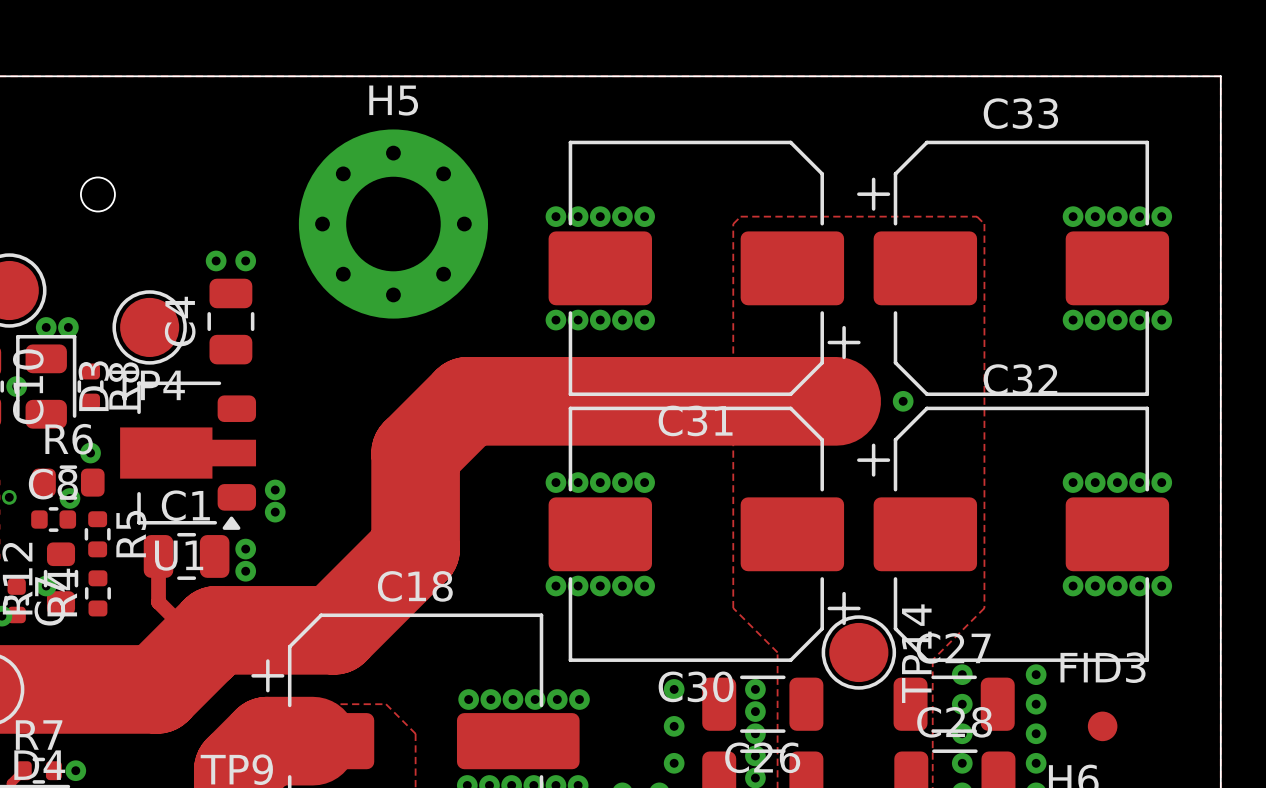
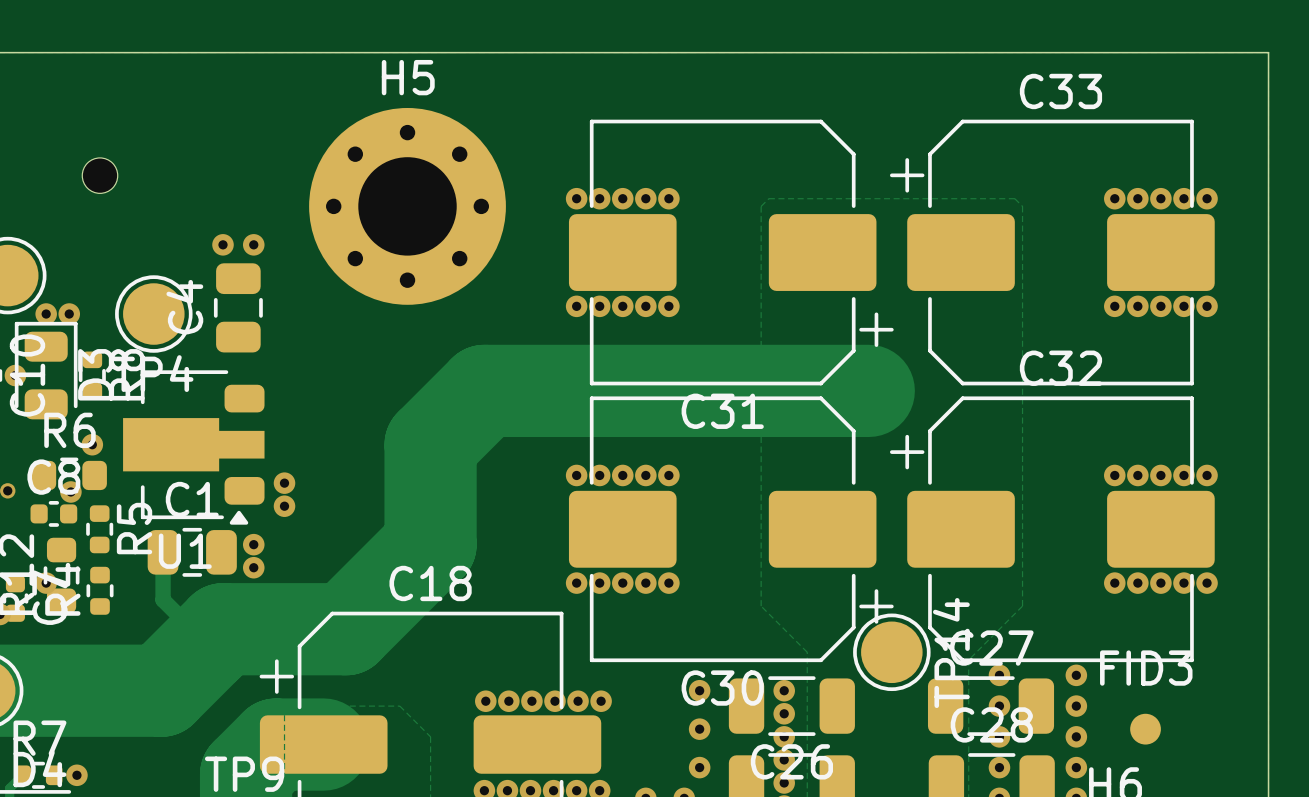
via: (903, 401) -> none

